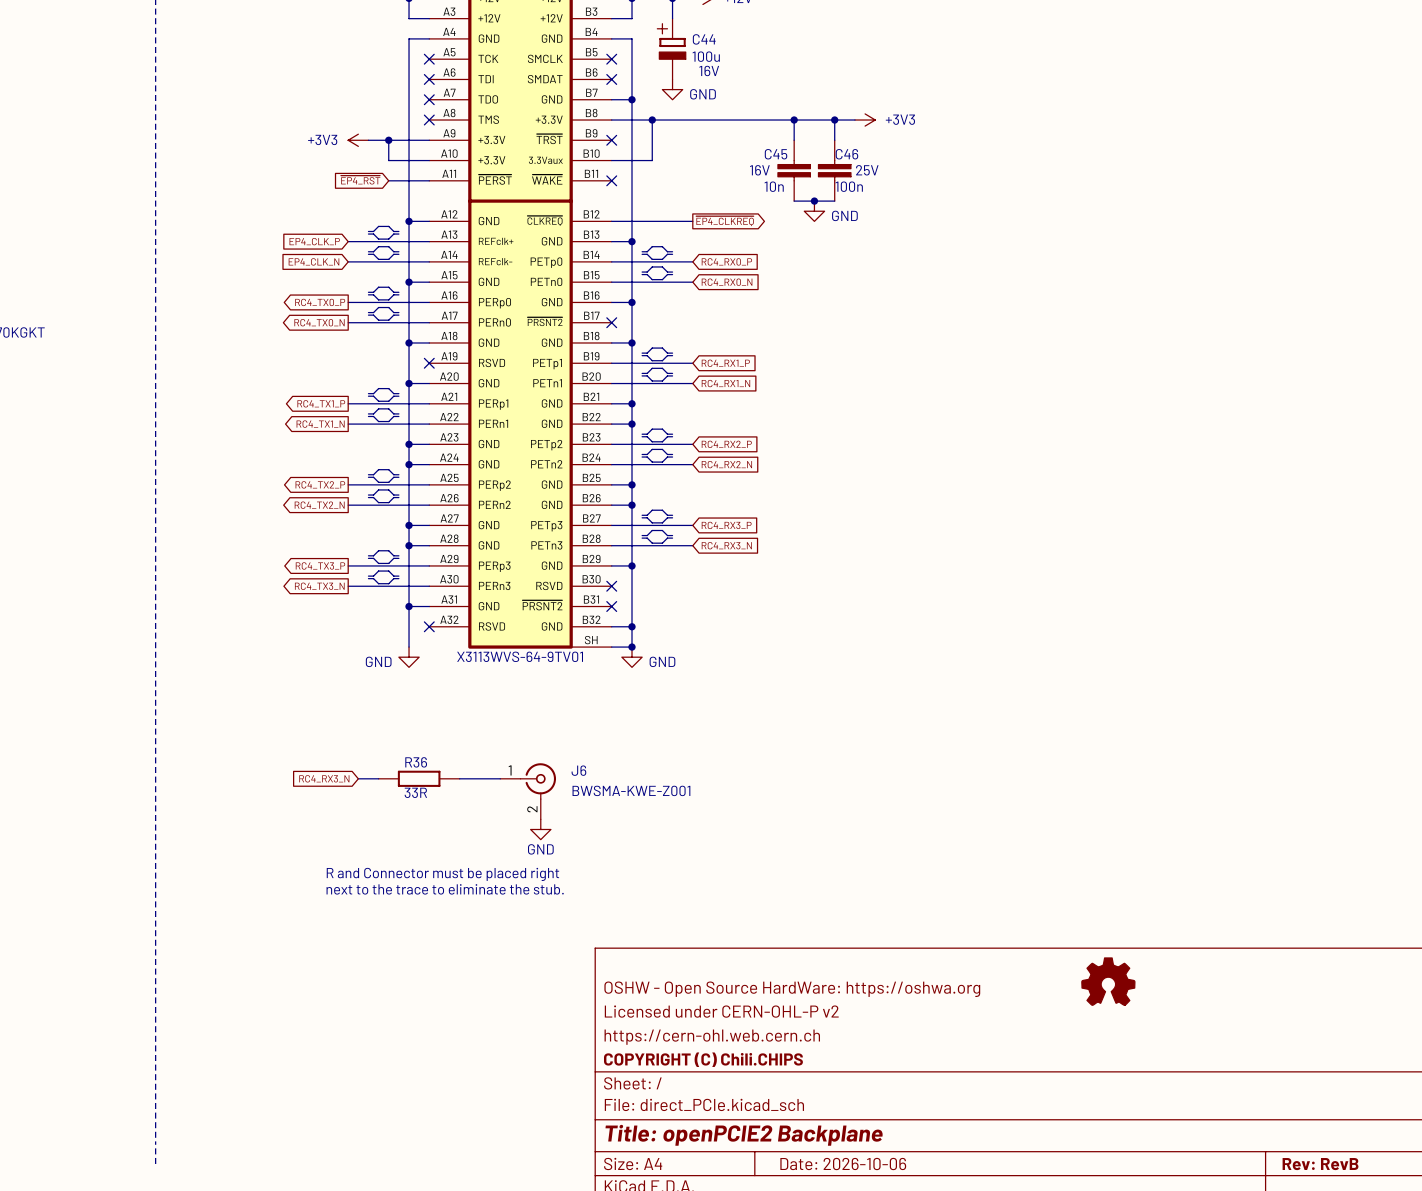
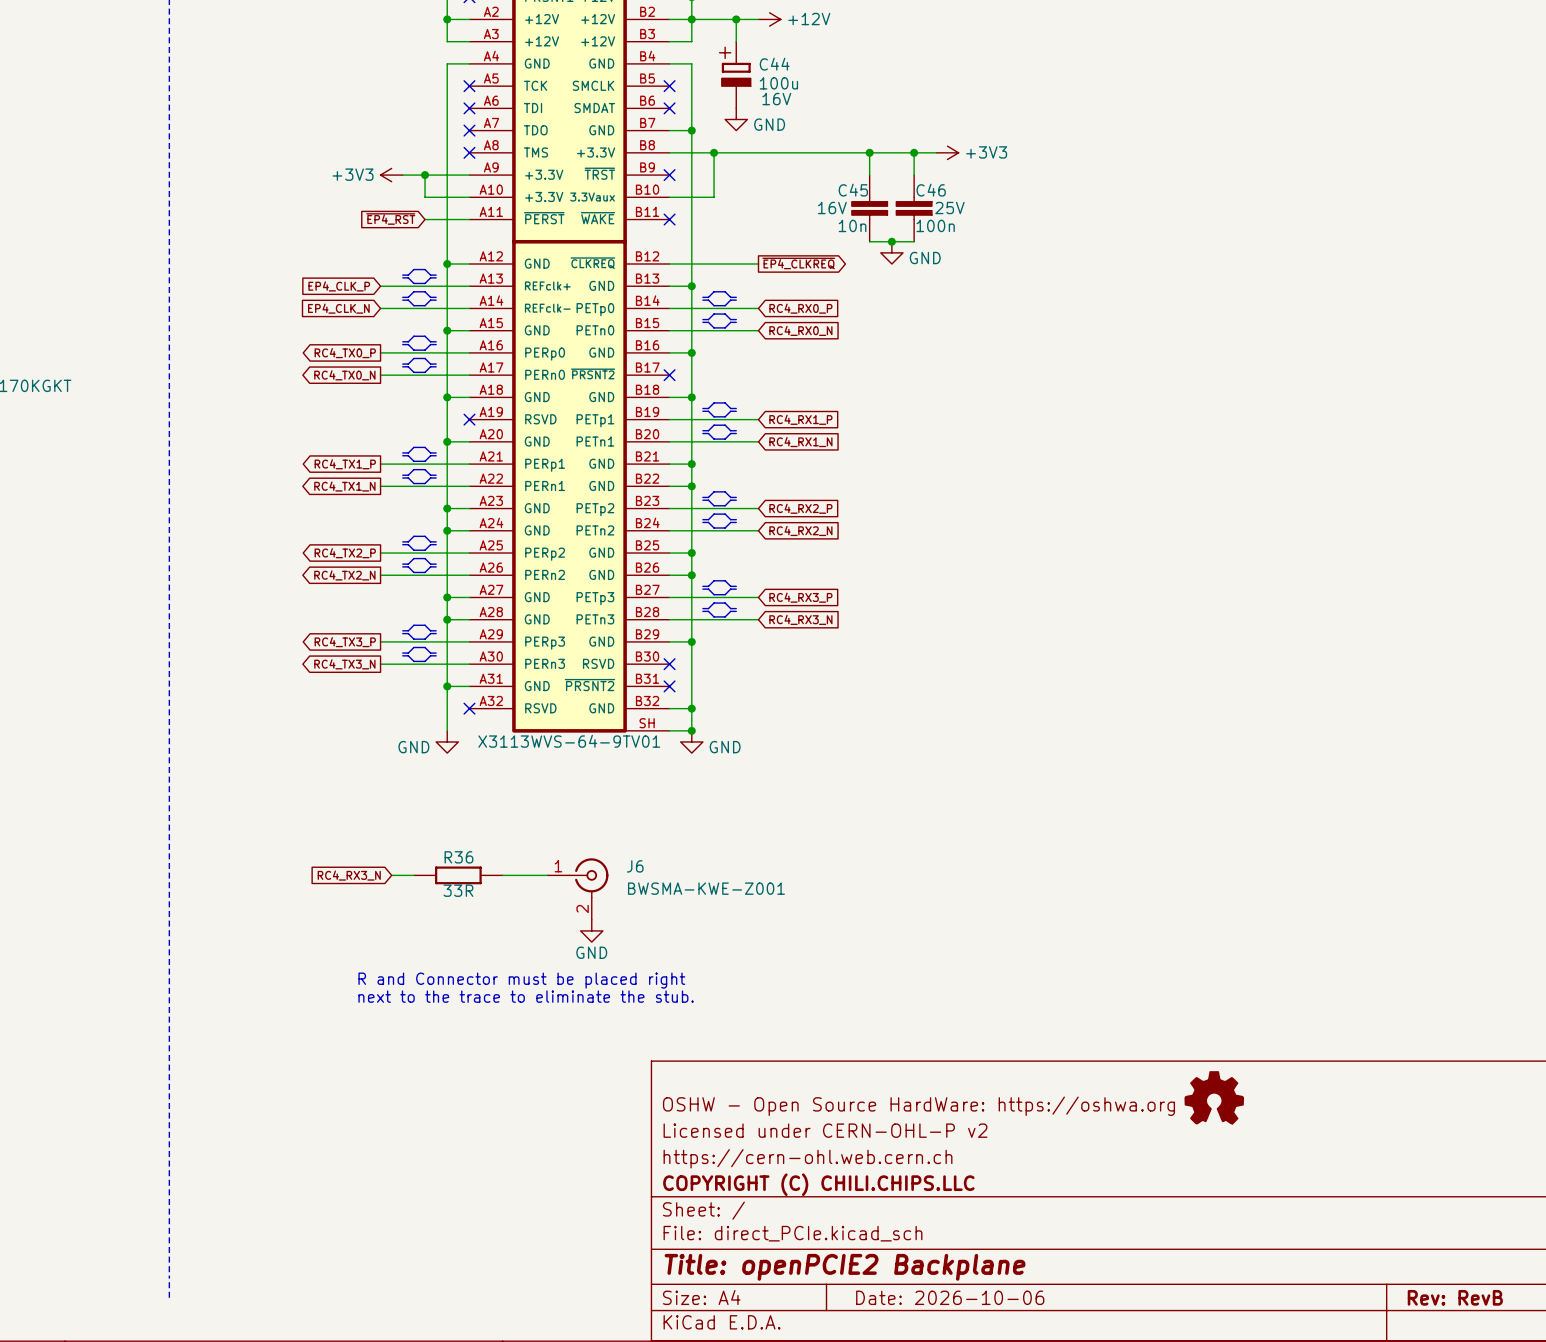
title block: COPYRIGHT (C) Chili.CHIPS (703, 1059) -> COPYRIGHT (C) CHILI.CHIPS.LLC (818, 1184)

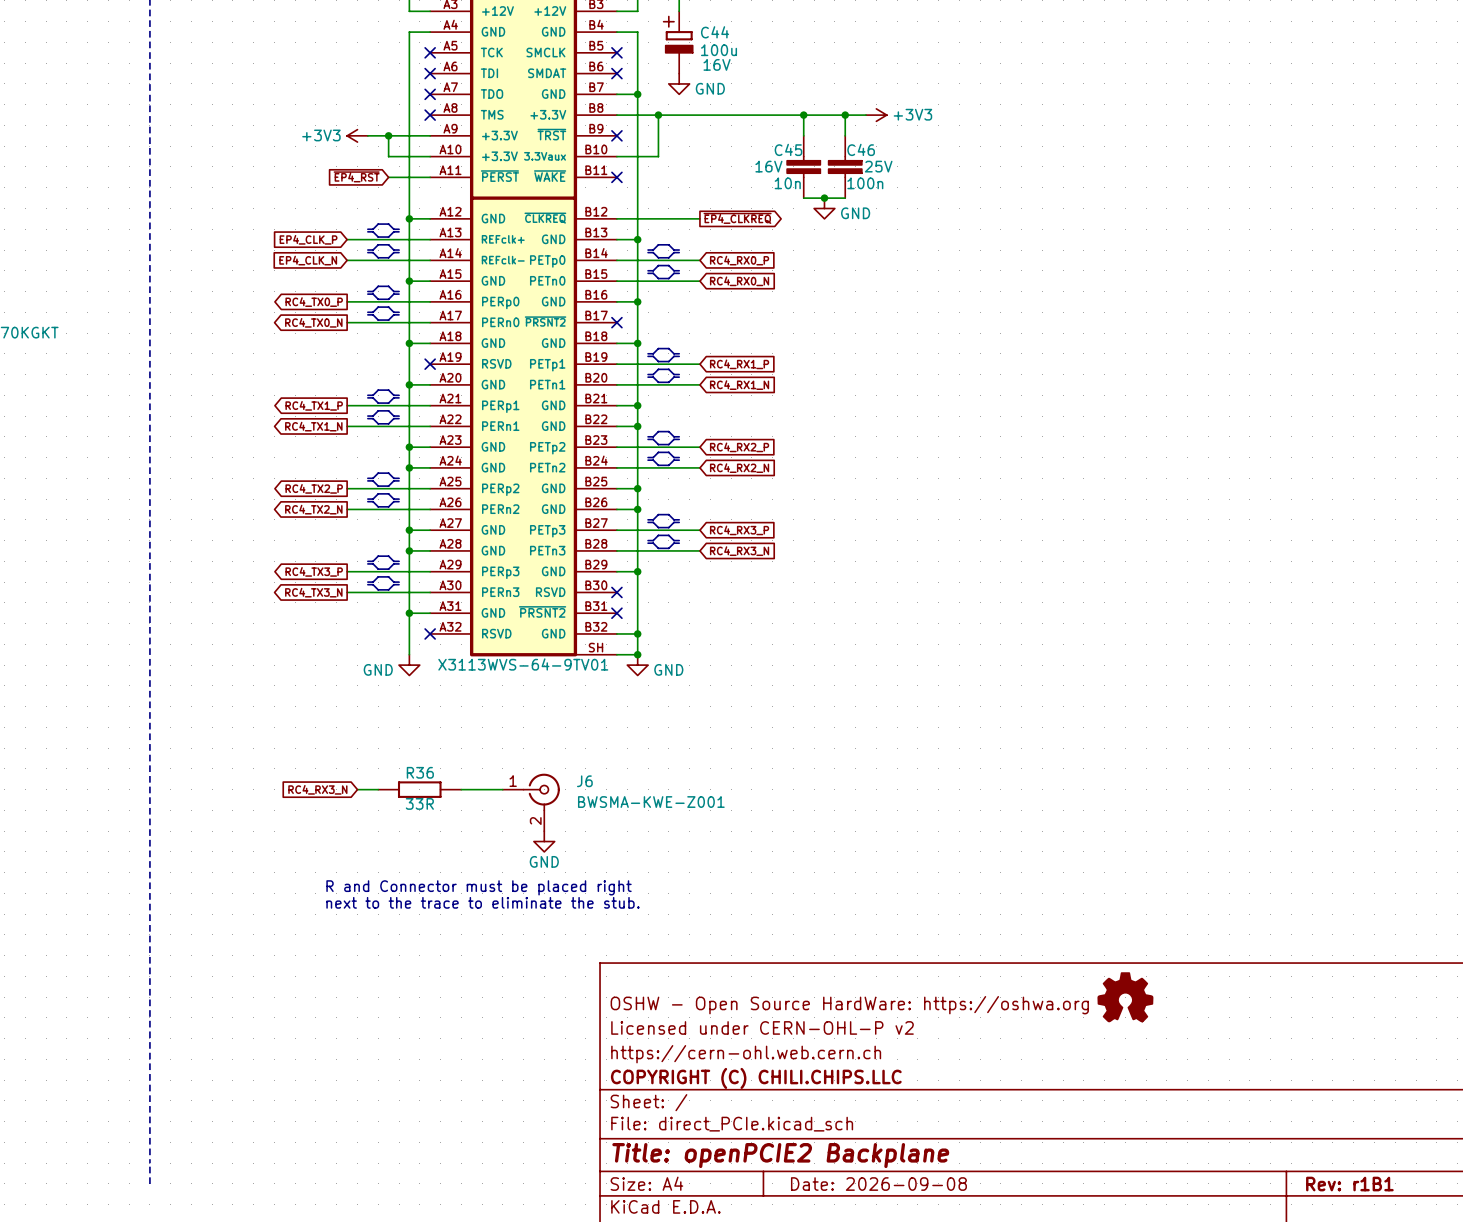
title block: Date: 2026-10-06 (950, 1297) -> Date: 2026-09-08 (878, 1184)
title block: Rev: RevB (1455, 1297) -> Rev: r1B1 (1349, 1184)

